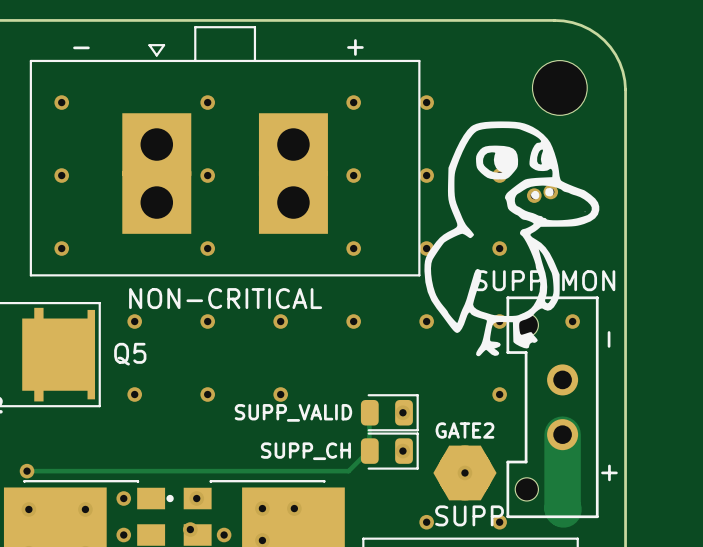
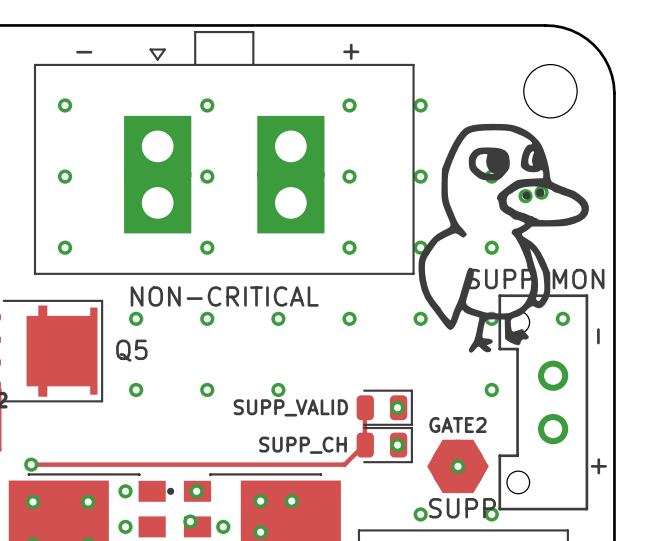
track: (562, 434) (563, 509) -> none

